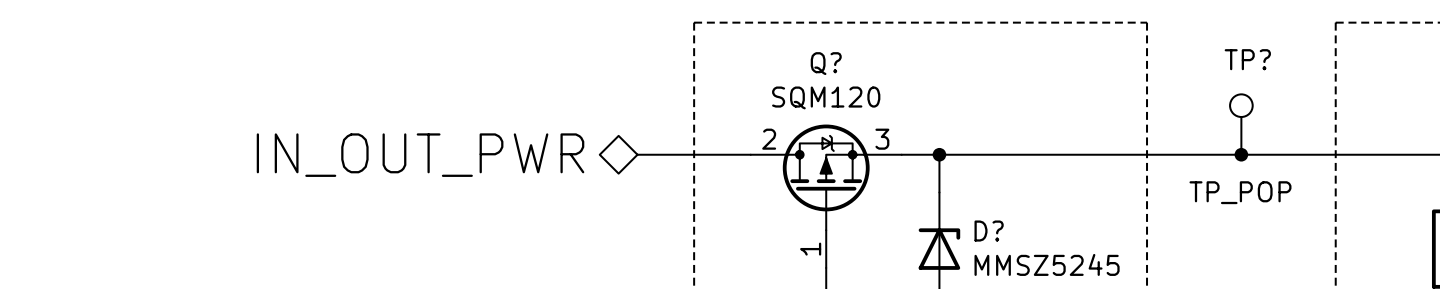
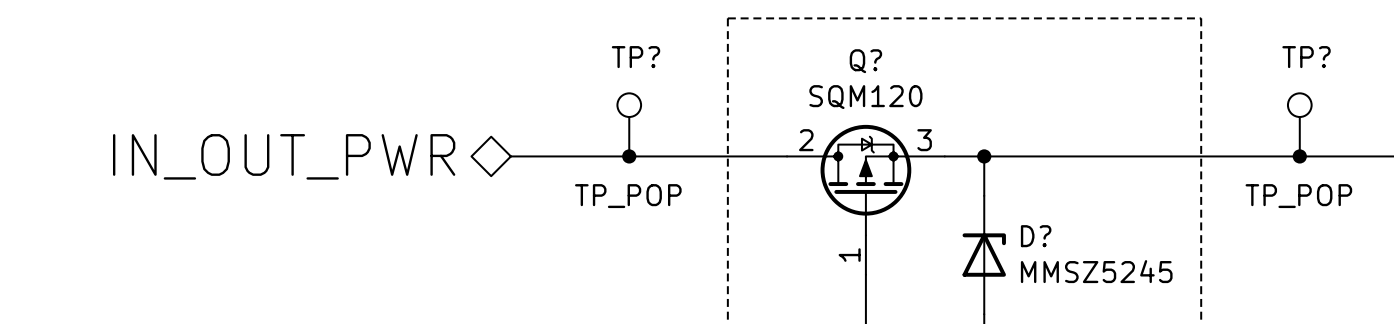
TP?: none -> TP_POP (629, 124)
wire: none -> (510, 156) (668, 156)
junction: none -> (629, 156)
hierarchical label position: IN_OUT_PWR (420, 155) -> IN_OUT_PWR (284, 156)

